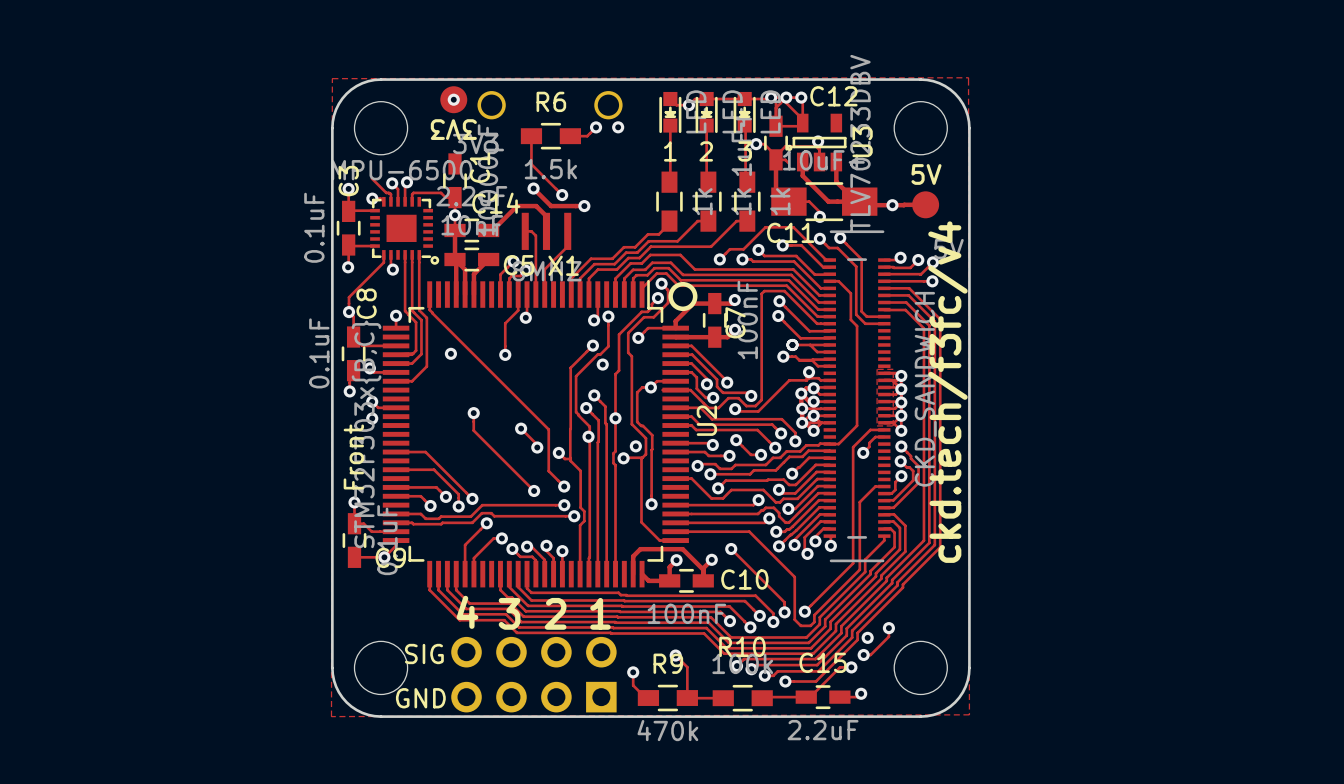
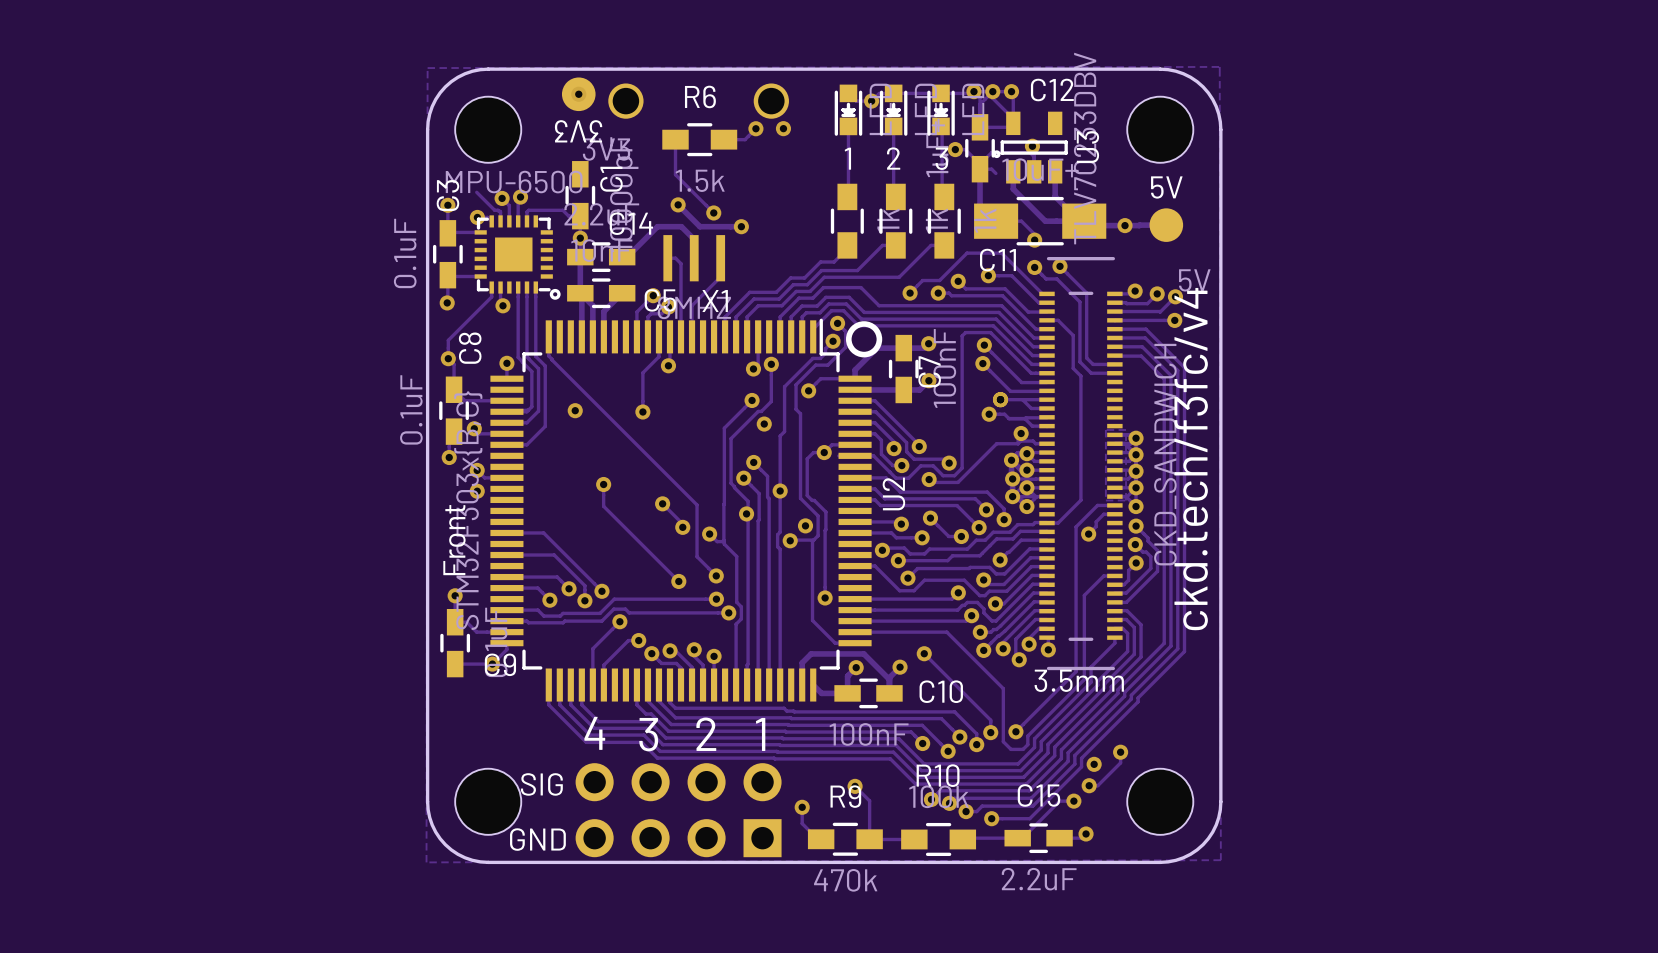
text: none -> 3.5mm (1079, 680)

